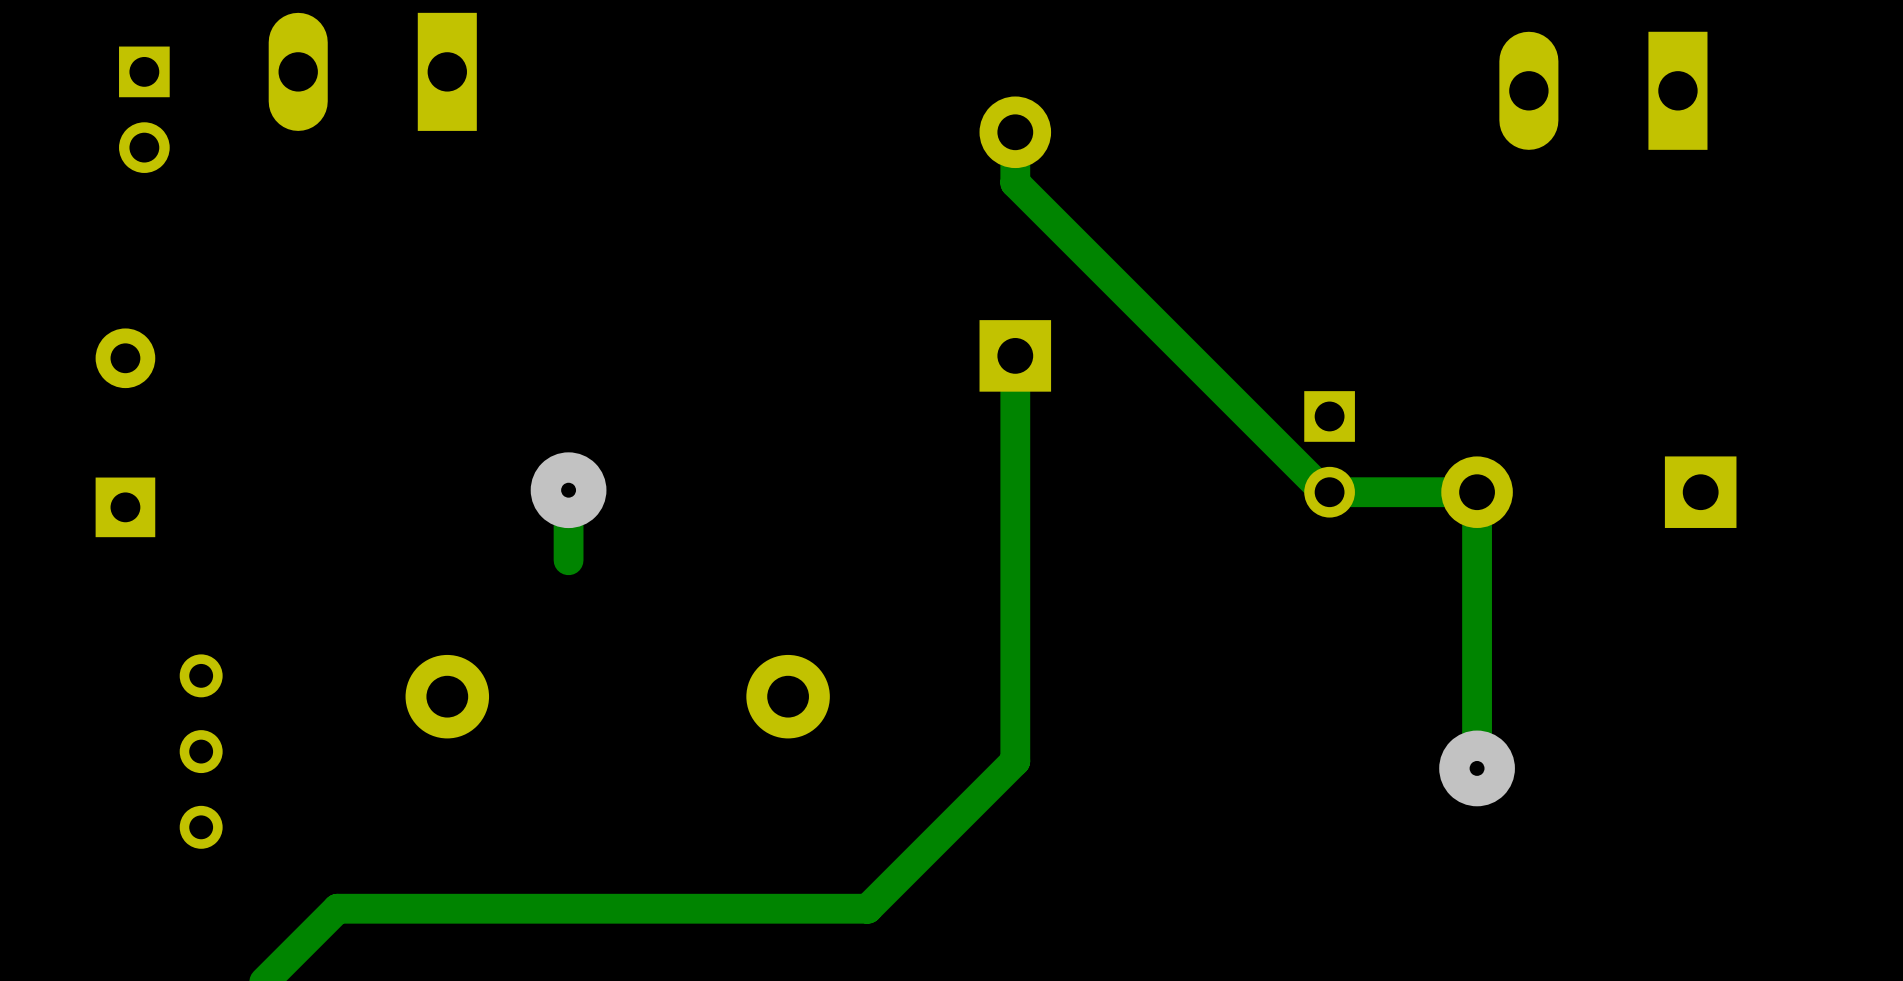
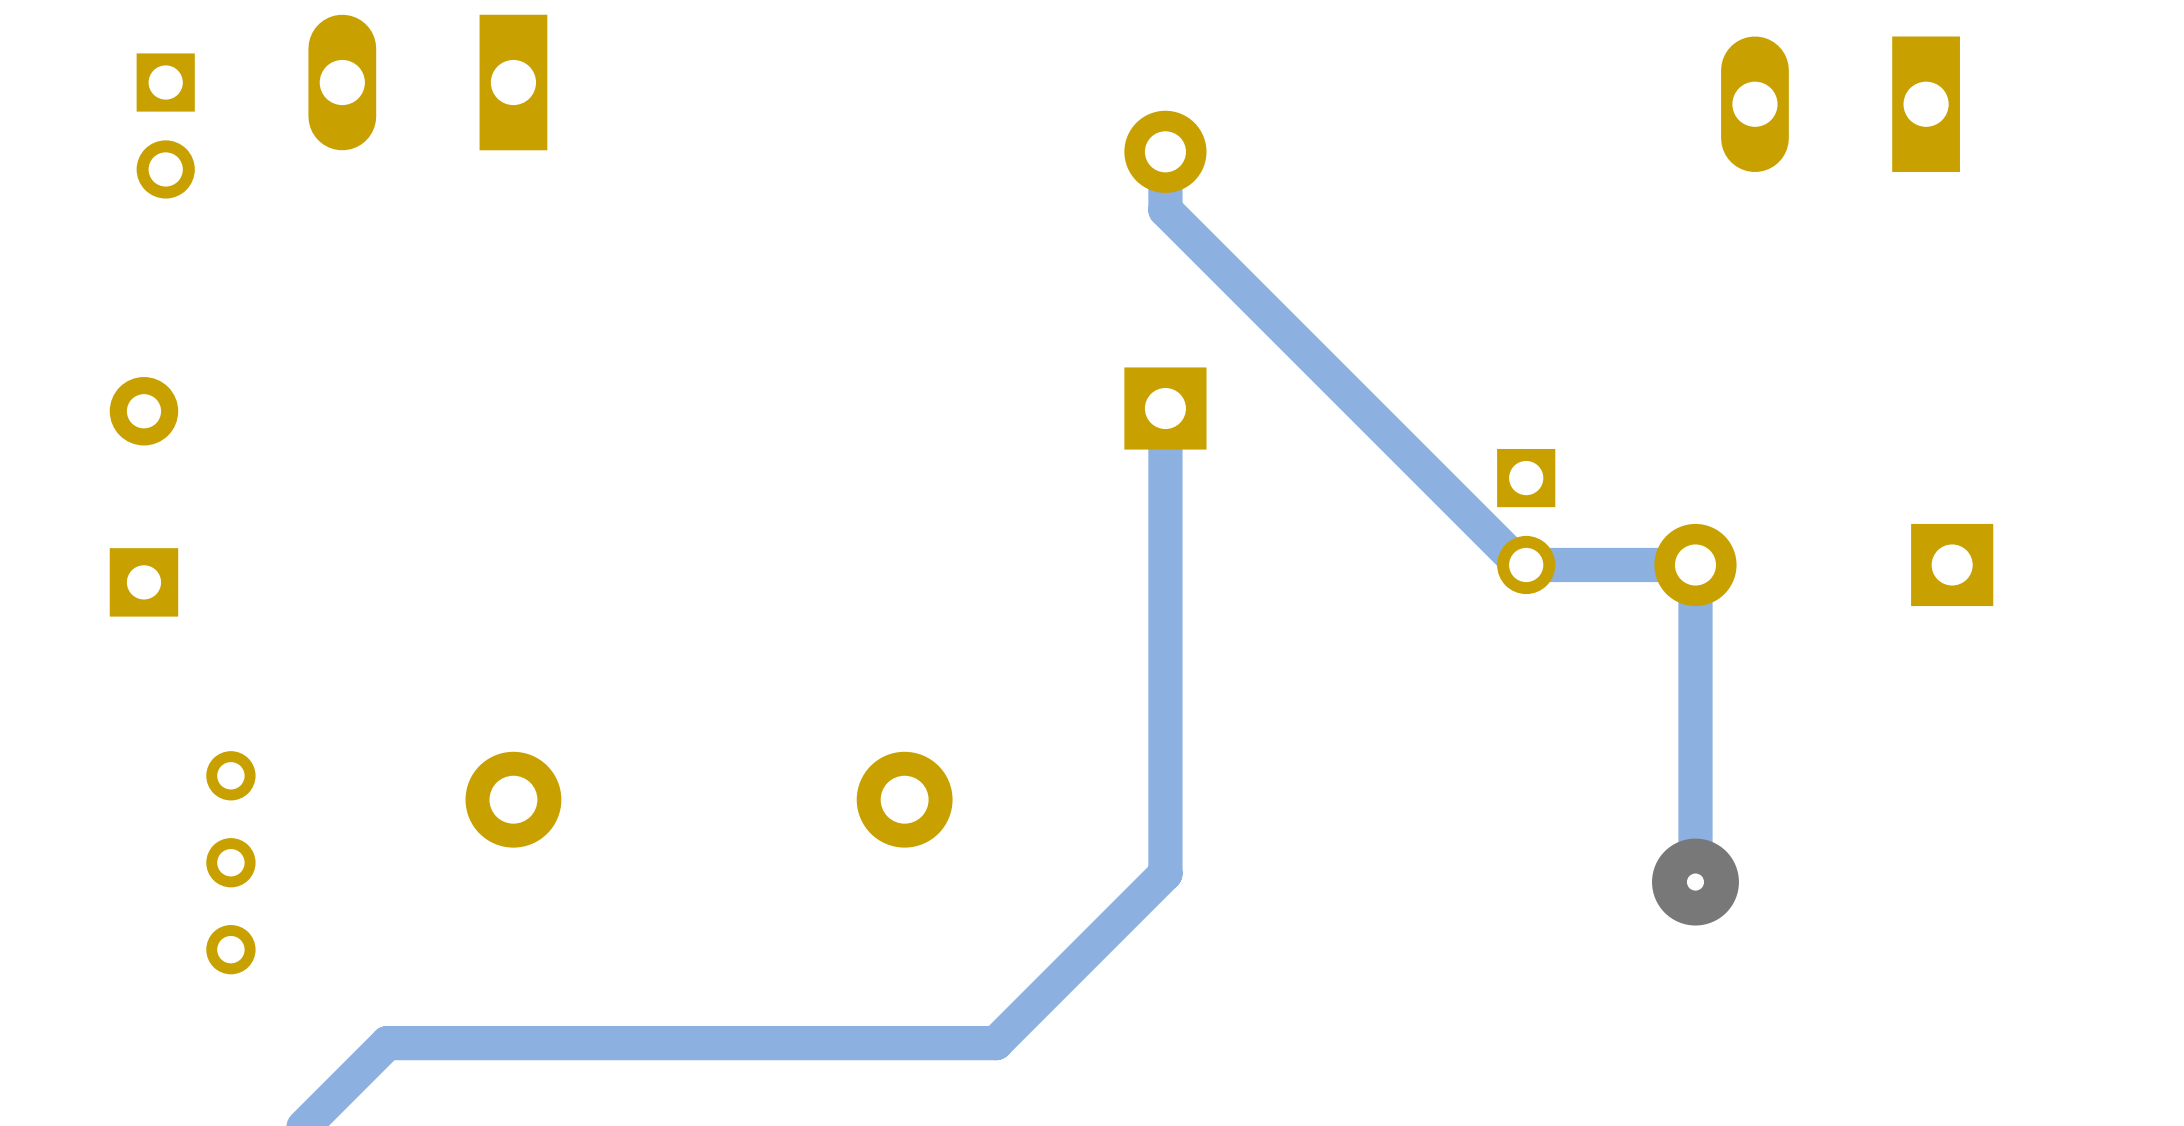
track: (568, 490) (568, 560) -> none
via: (568, 490) -> none

